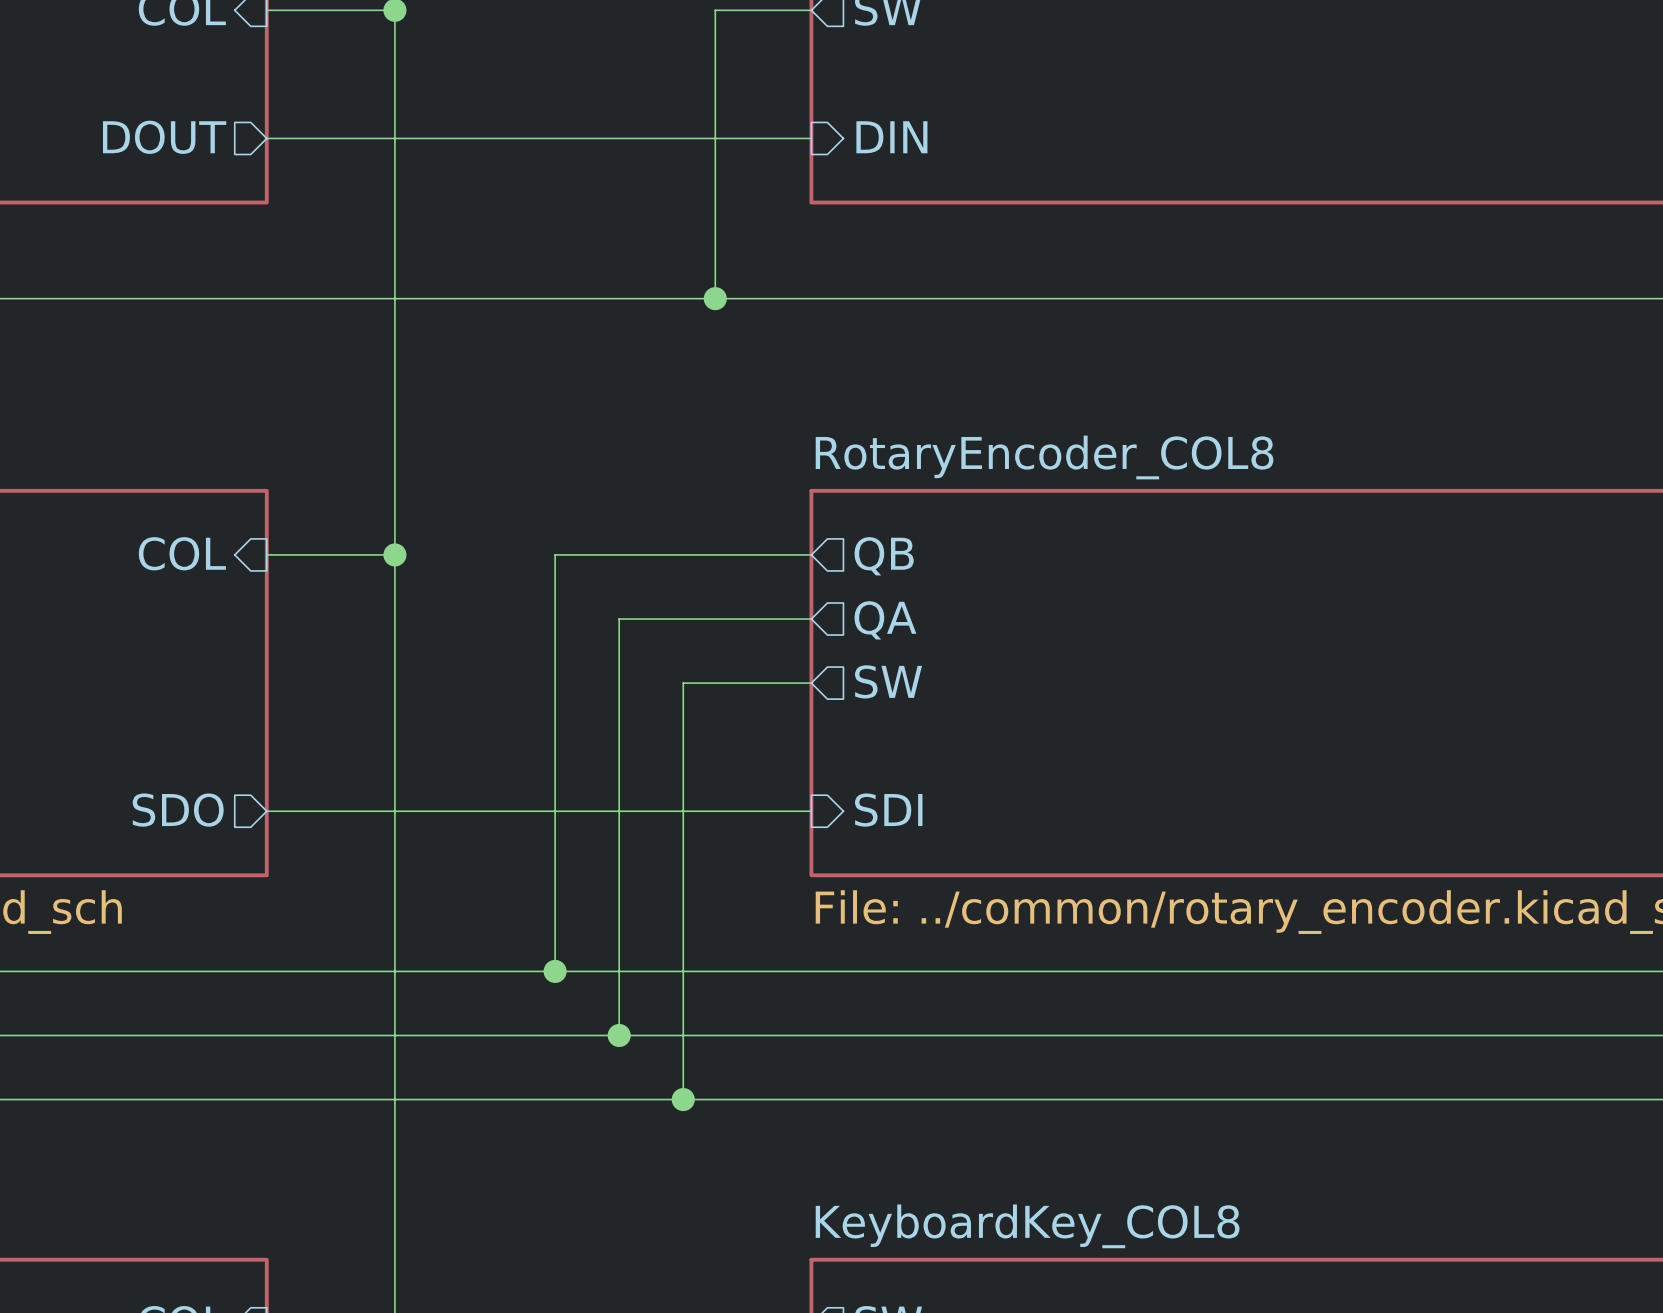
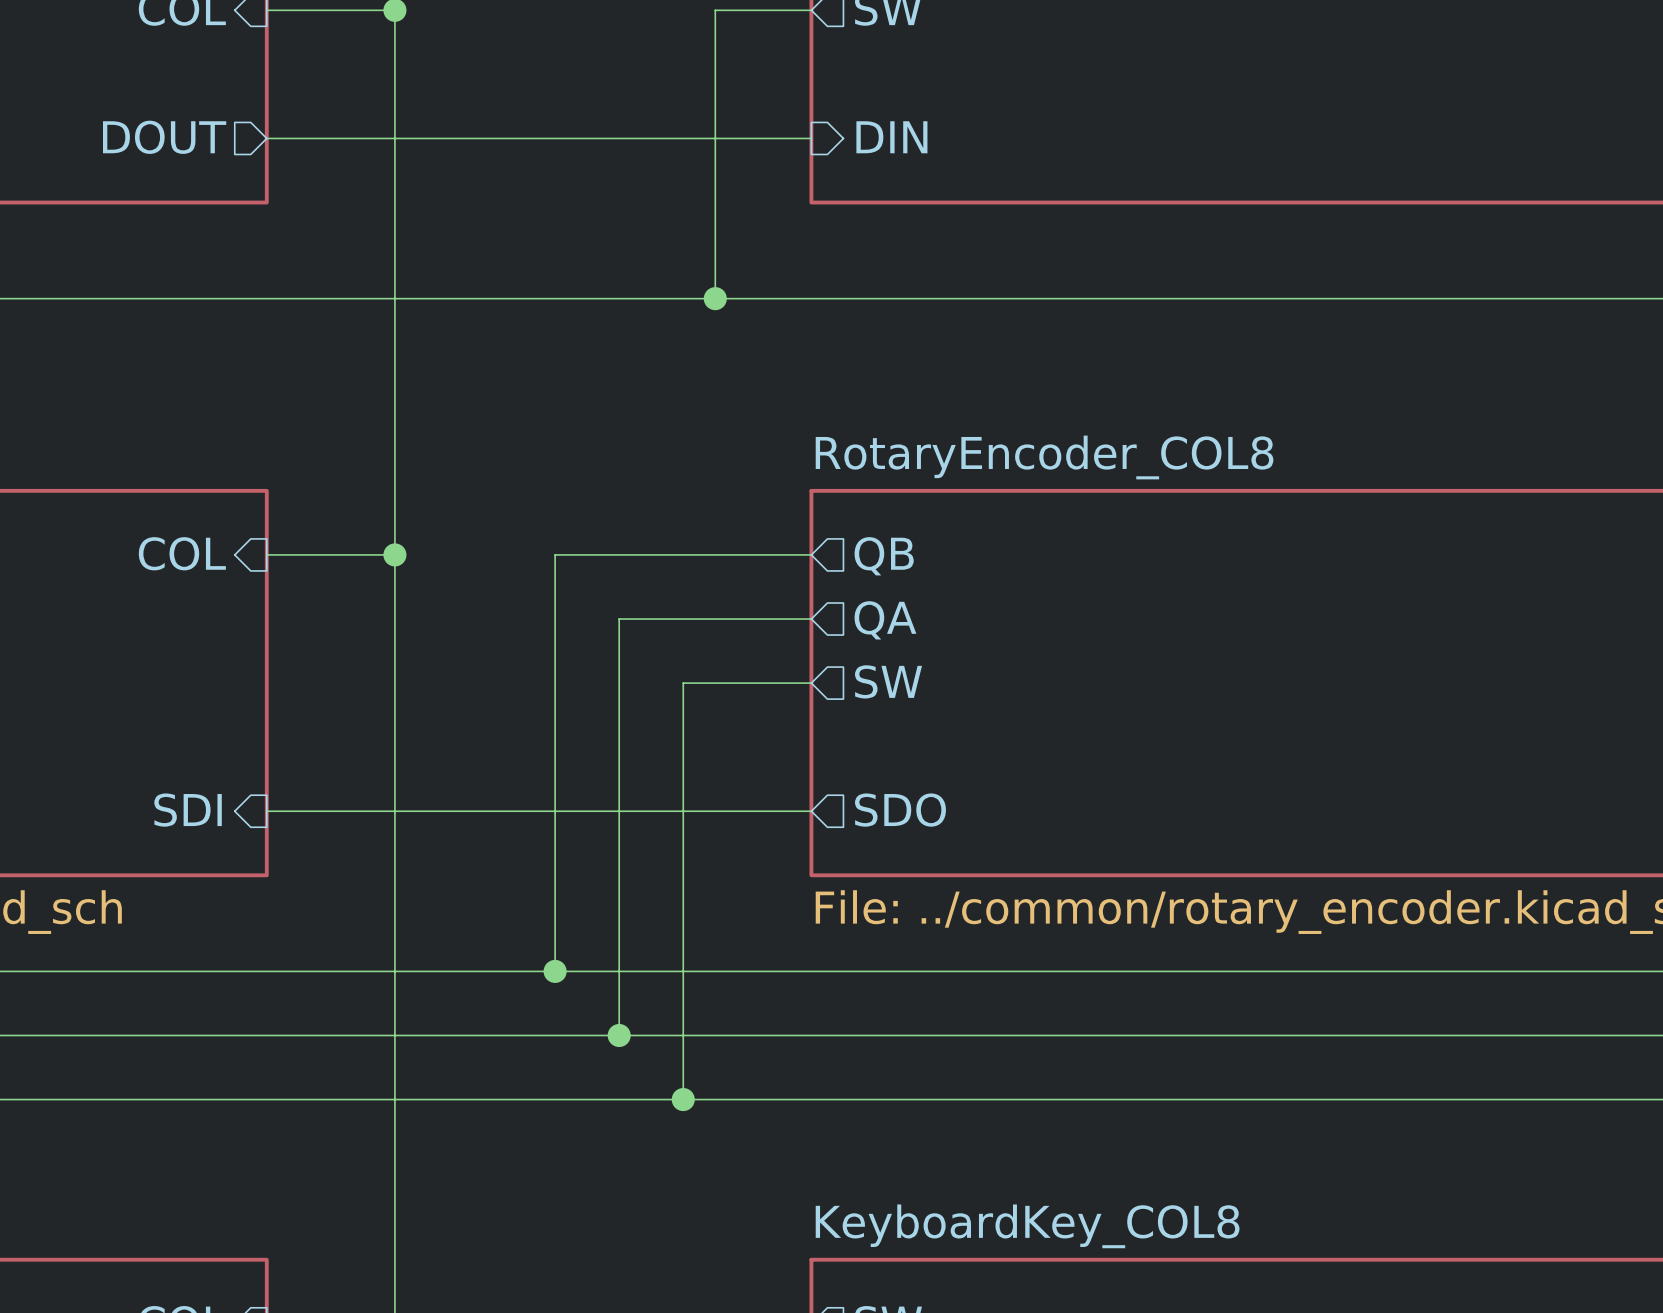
sheet pin shape: output (178, 810) -> input (188, 810)
sheet pin: SDO (178, 810) -> SDI (188, 810)
sheet pin shape: input (888, 810) -> output (900, 810)
sheet pin: SDI (888, 810) -> SDO (900, 810)

